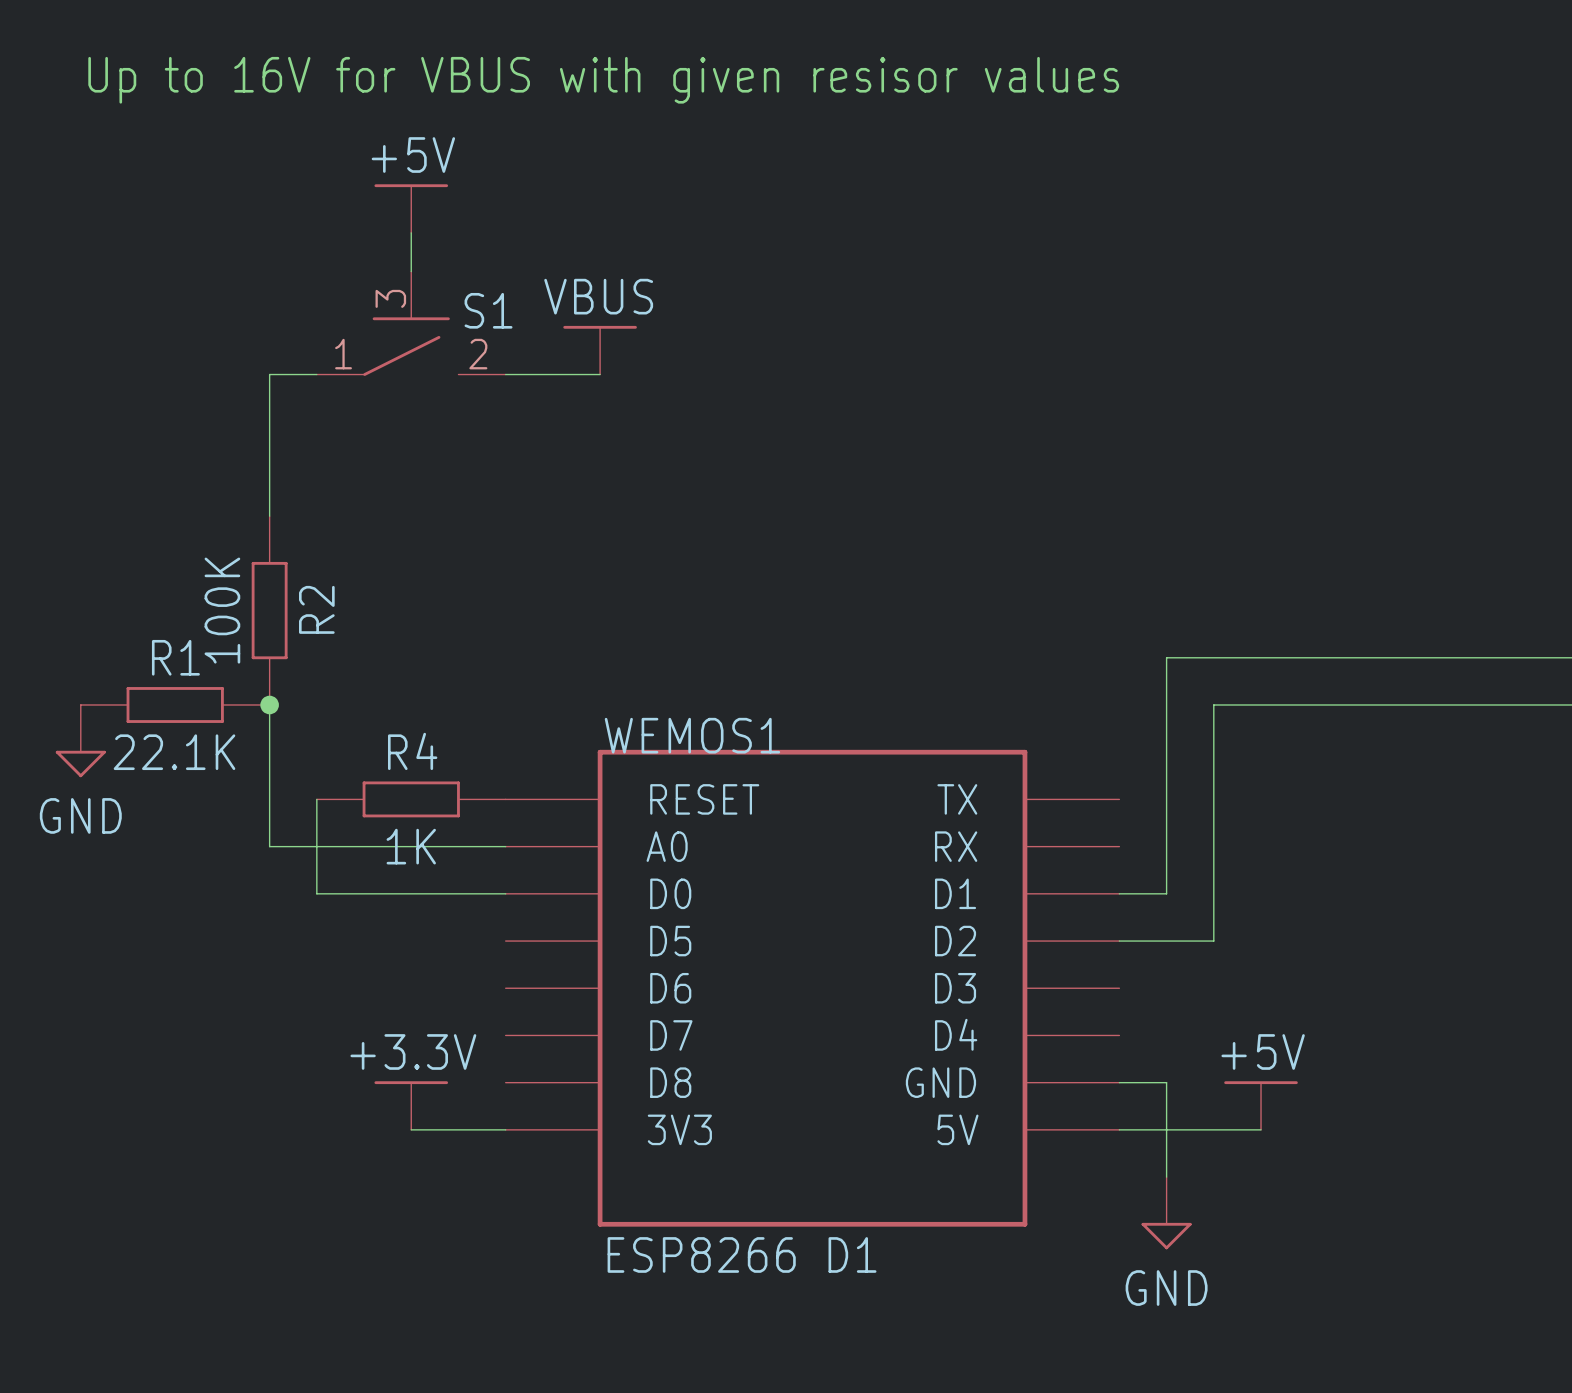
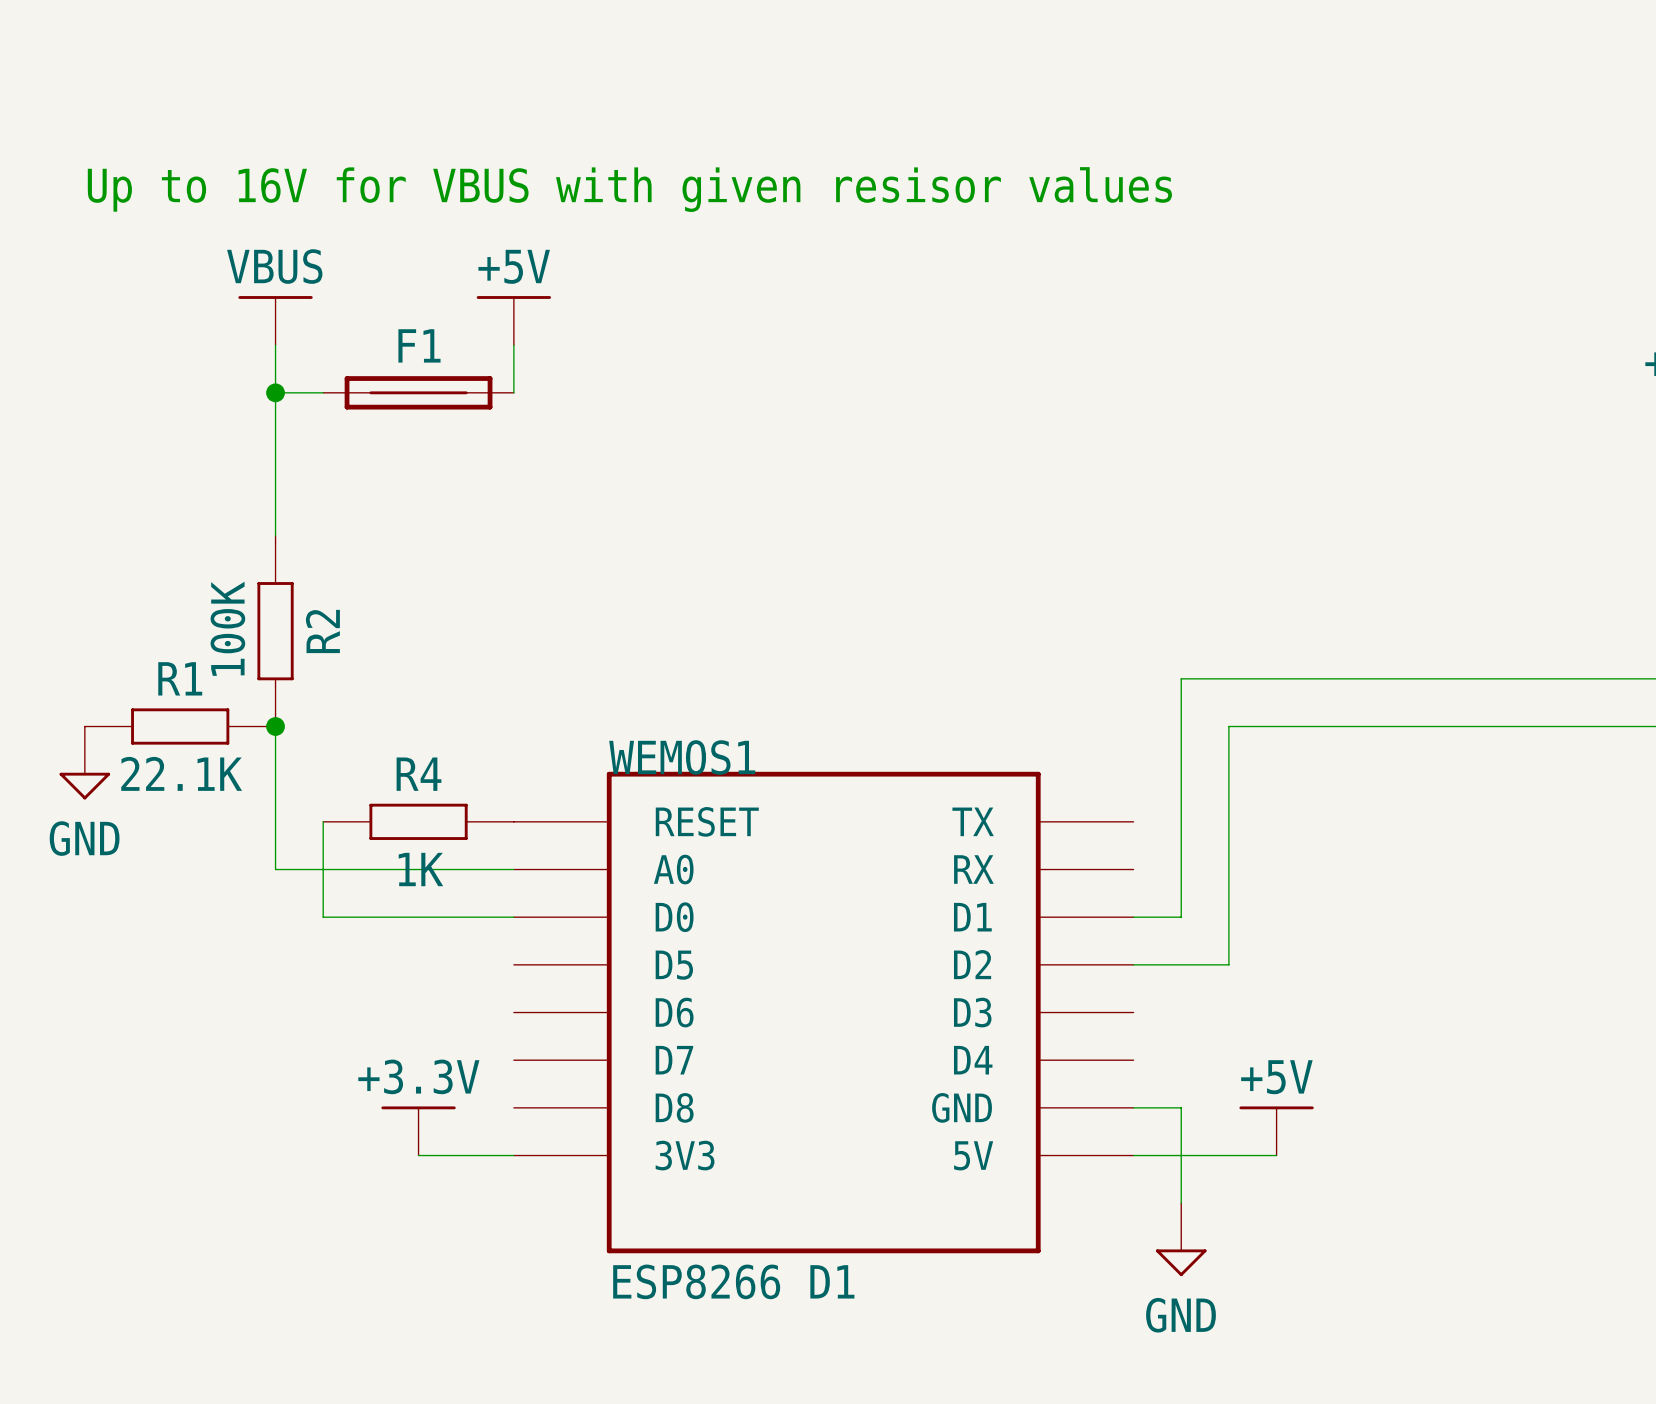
text position: Up to 16V for VBUS with given resisor values (603, 80) -> Up to 16V for VBUS with given resisor values (629, 189)
power symbol position: +5V (411, 208) -> +5V (513, 320)
wire: (411, 232) (411, 271) -> none
S1: (411, 323) -> none
wire: none -> (275, 345) (275, 392)
power symbol position: VBUS (600, 350) -> VBUS (275, 320)
junction: none -> (275, 392)
F1: none -> (418, 392)
wire: (505, 374) (600, 374) -> (513, 392) (513, 345)

